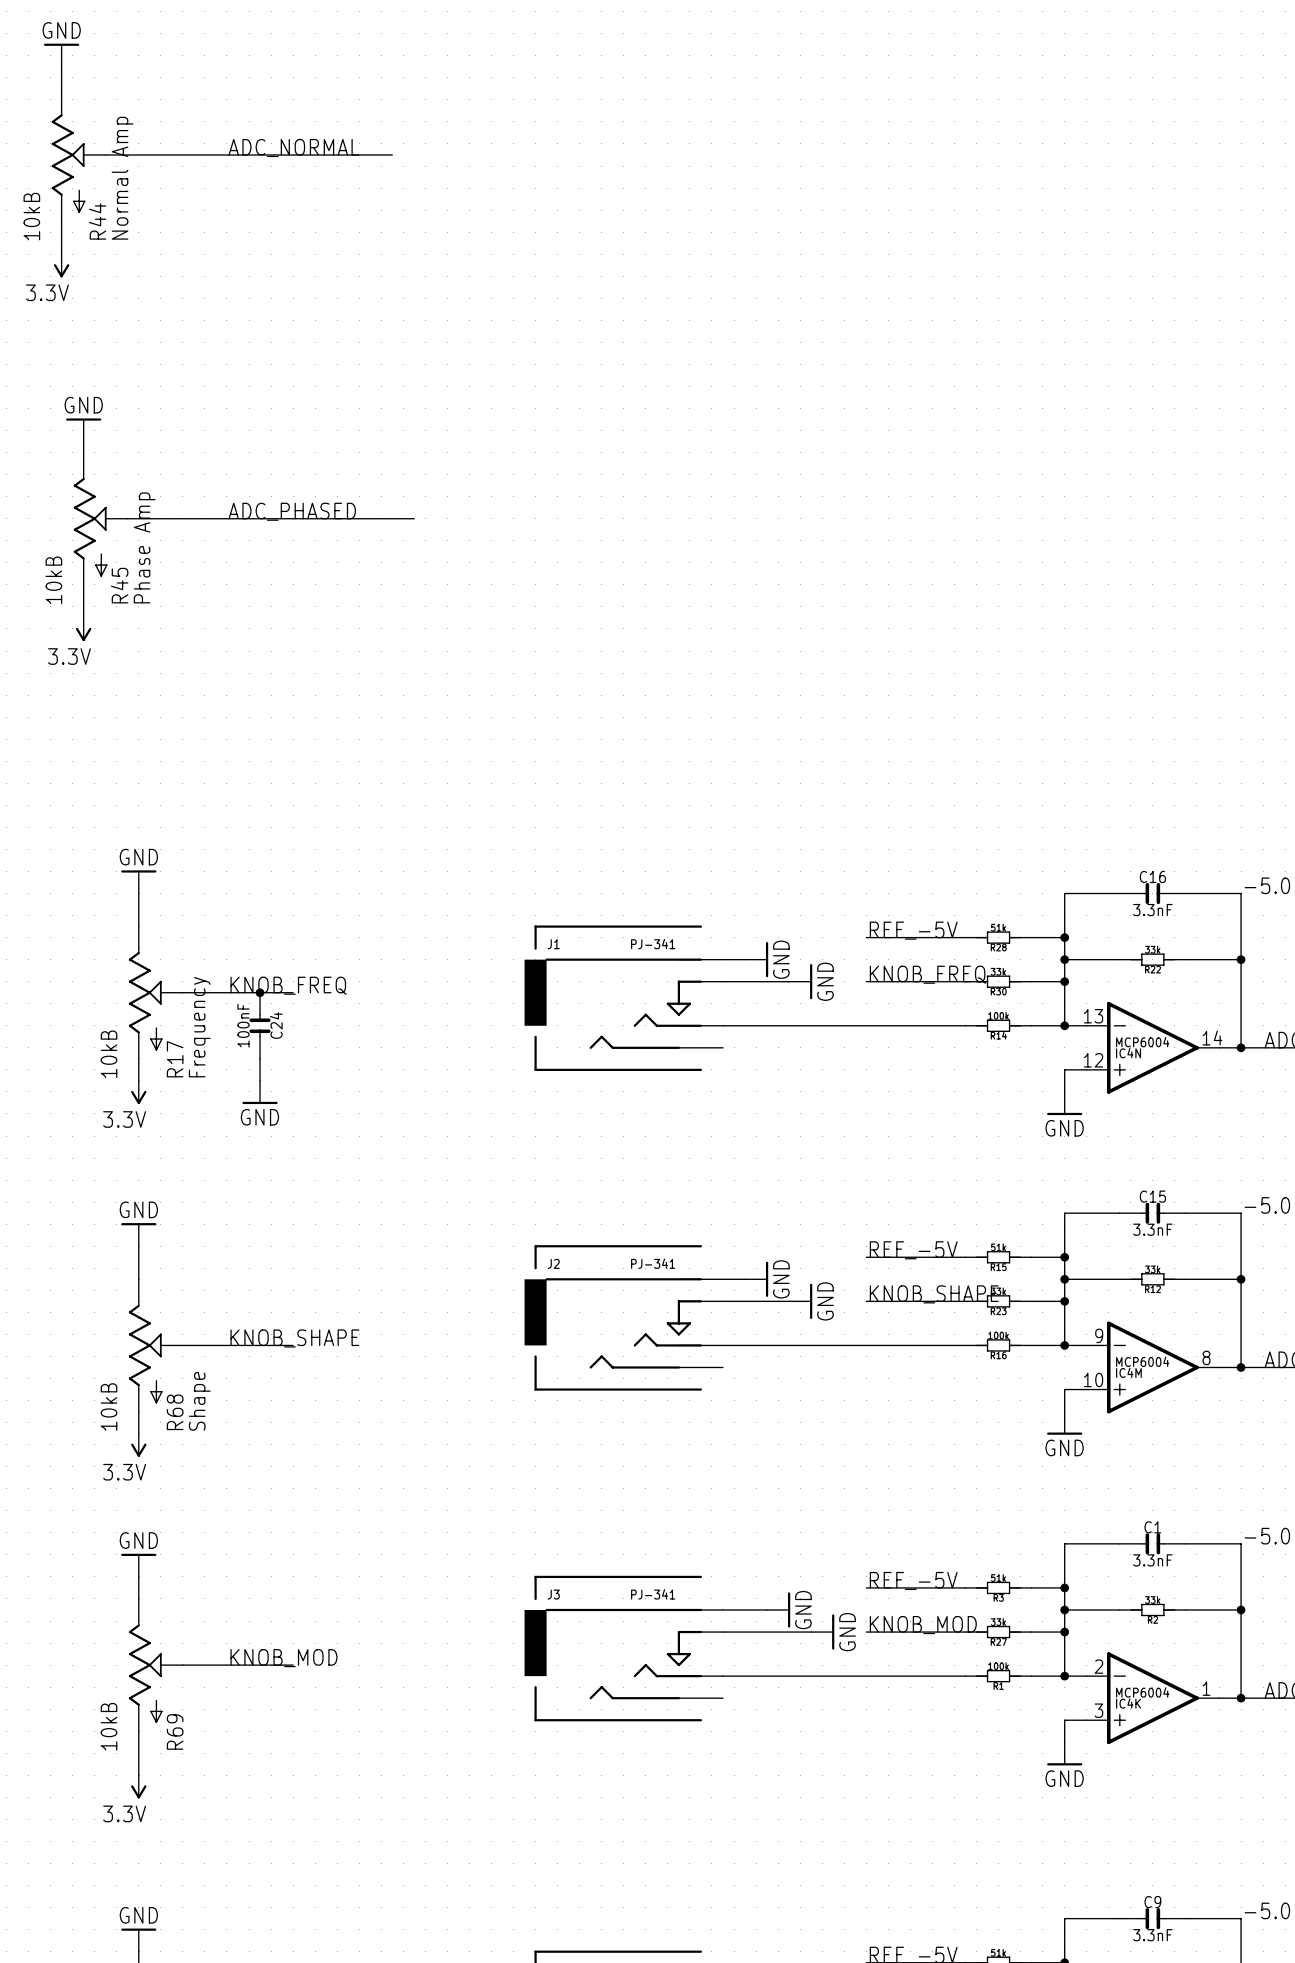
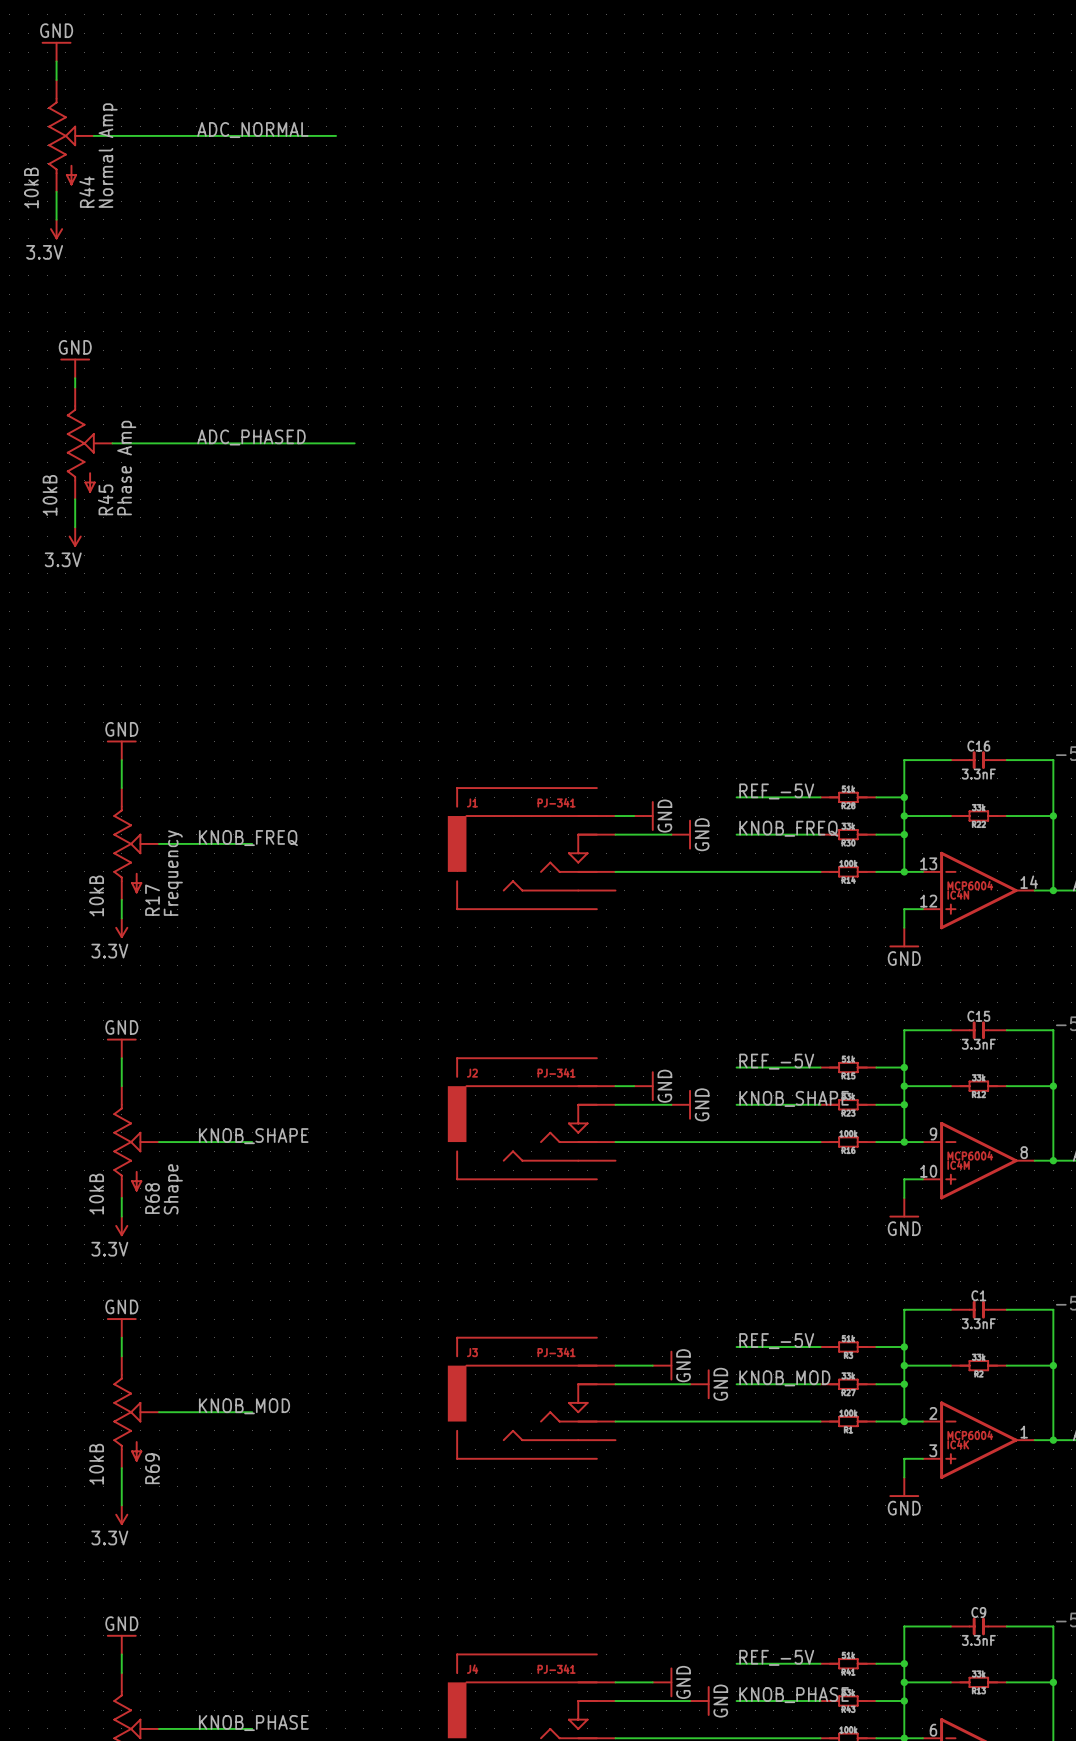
junction: (260, 992) -> none
C24: 100nF (260, 1025) -> none
wire: (260, 1058) (260, 1080) -> none
power symbol: GND (260, 1092) -> none

